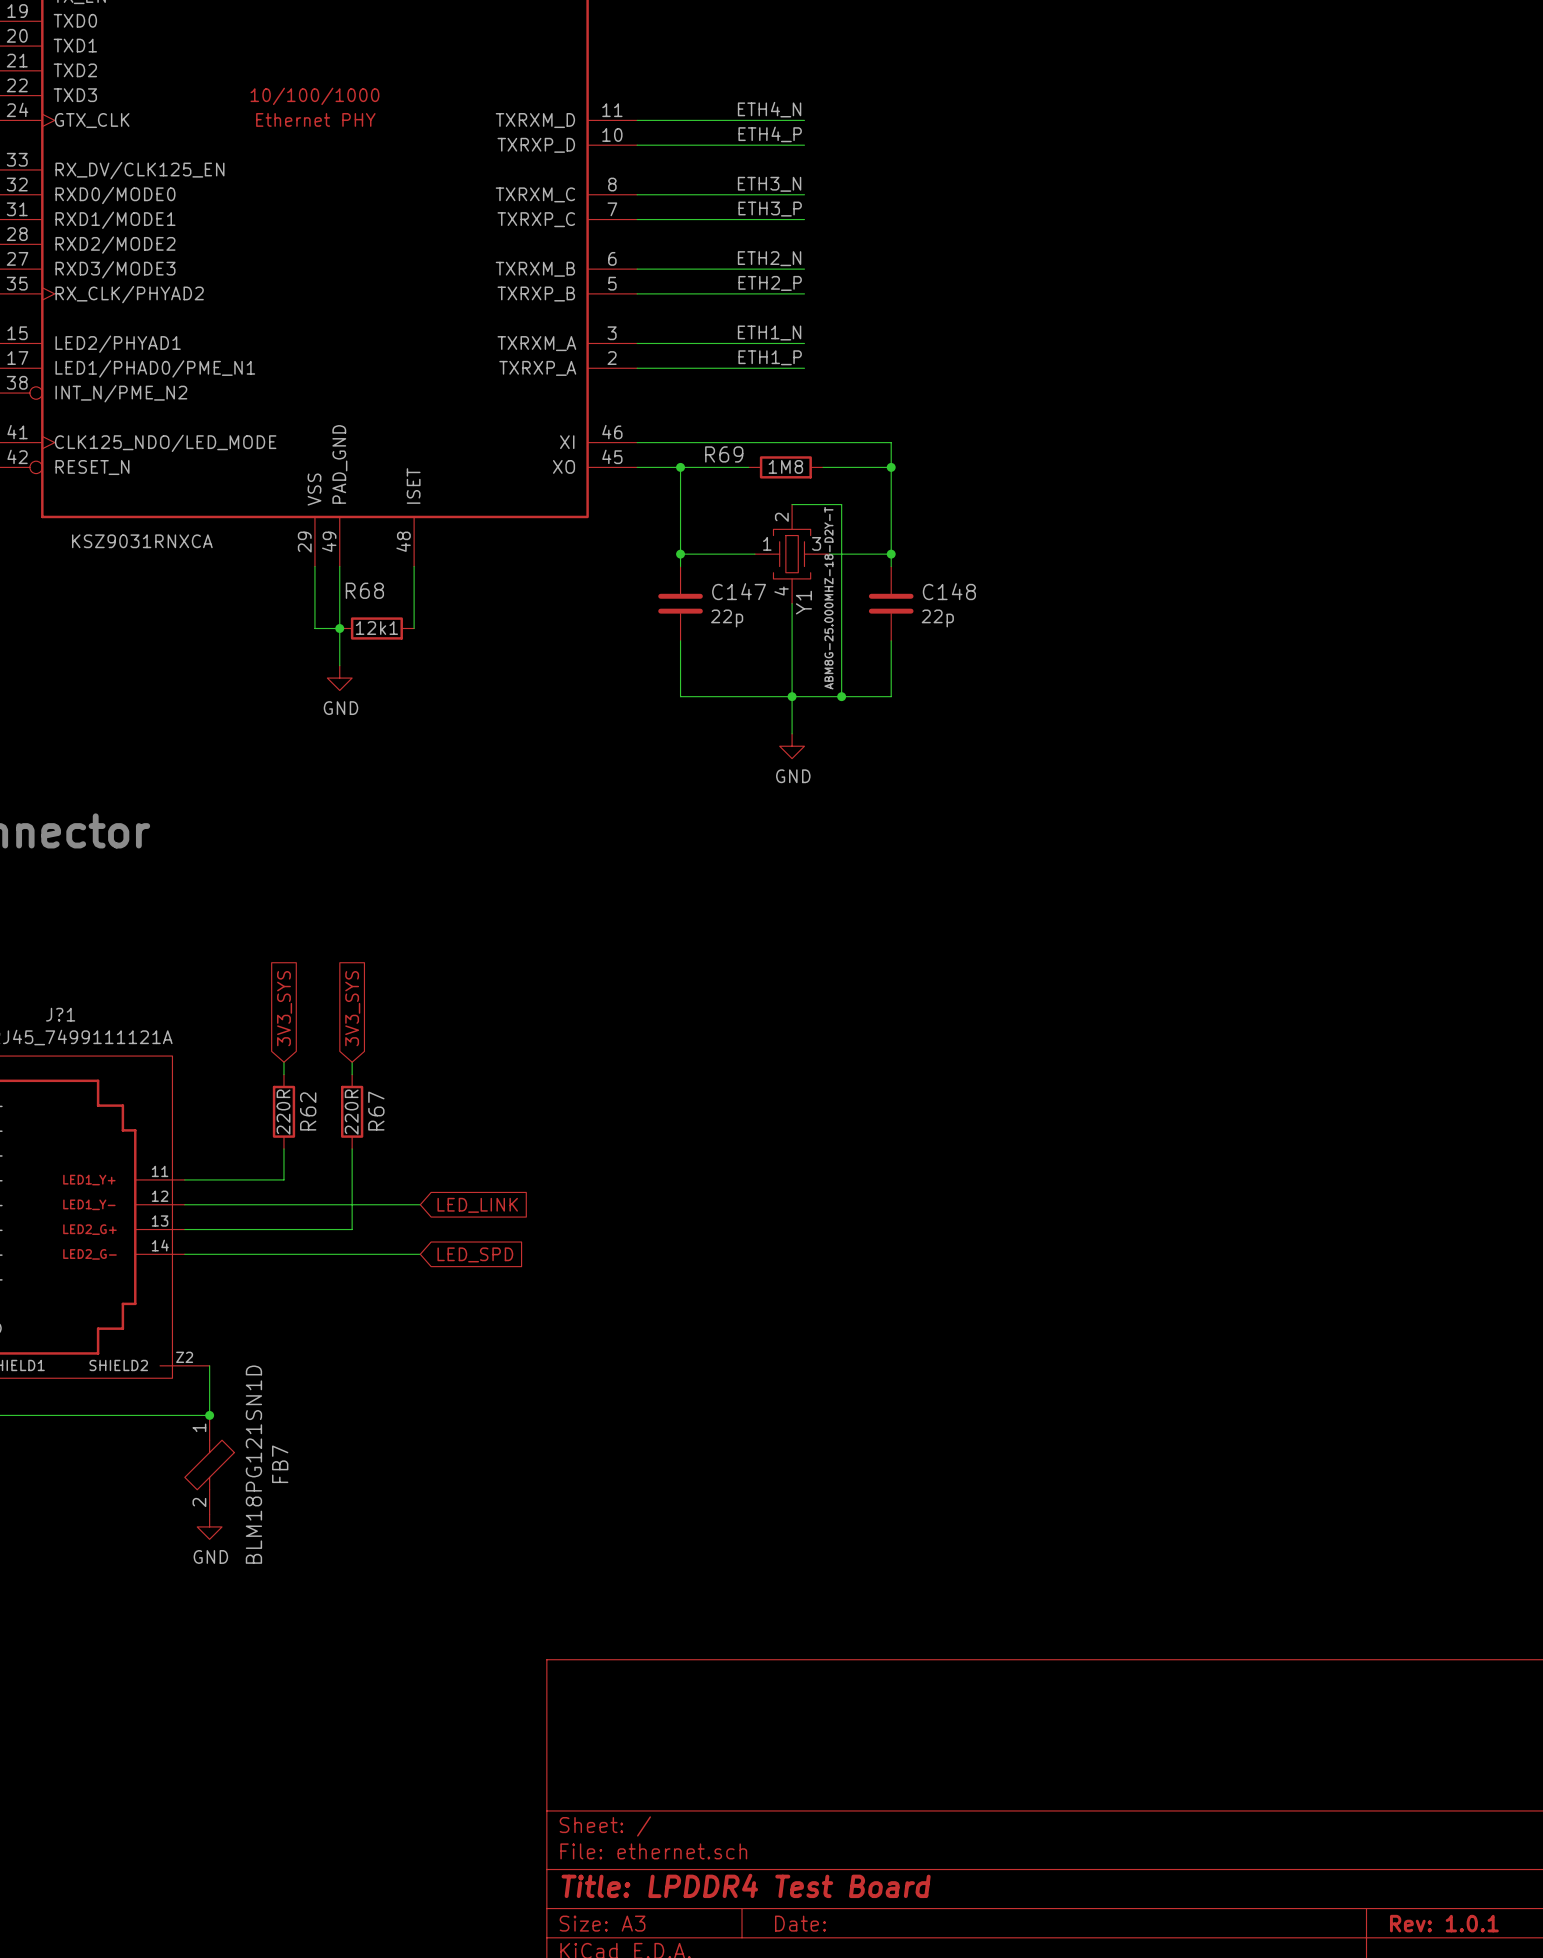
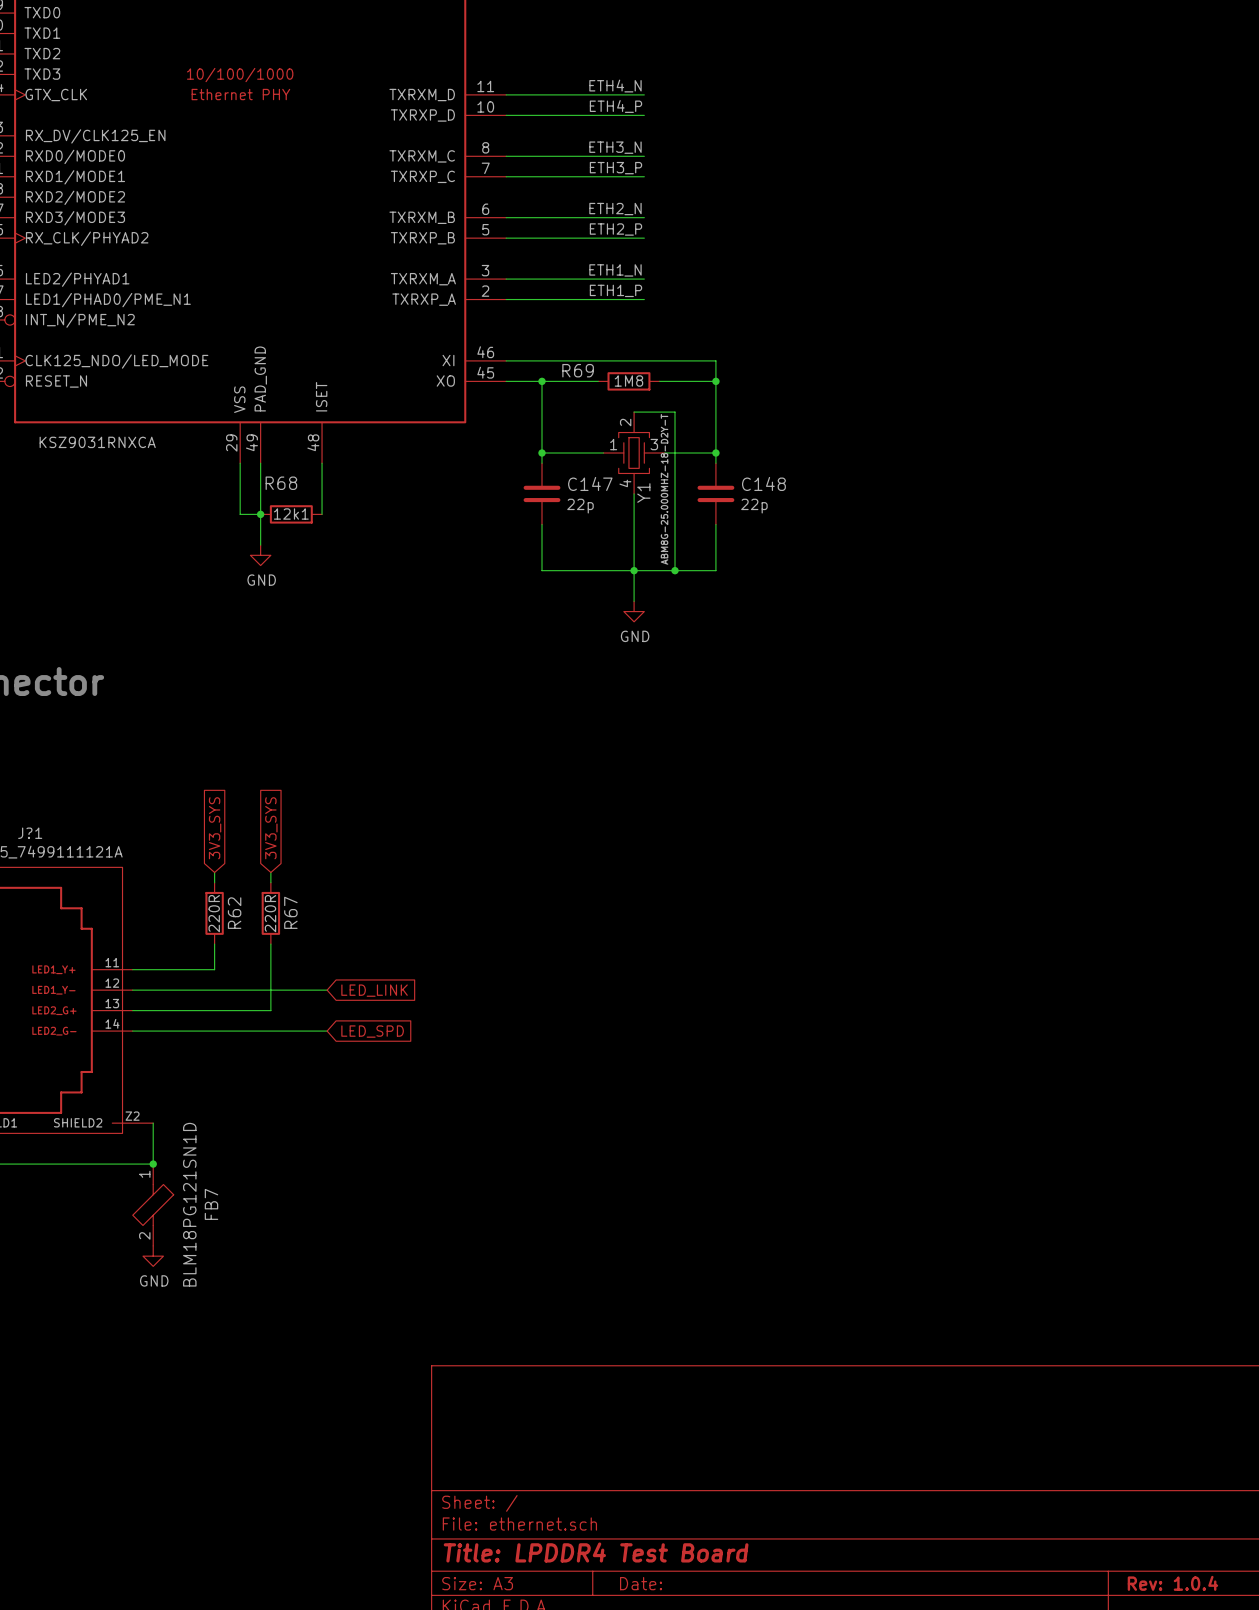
title block: Rev: 1.0.1 (1444, 1923) -> Rev: 1.0.4 (1172, 1583)

